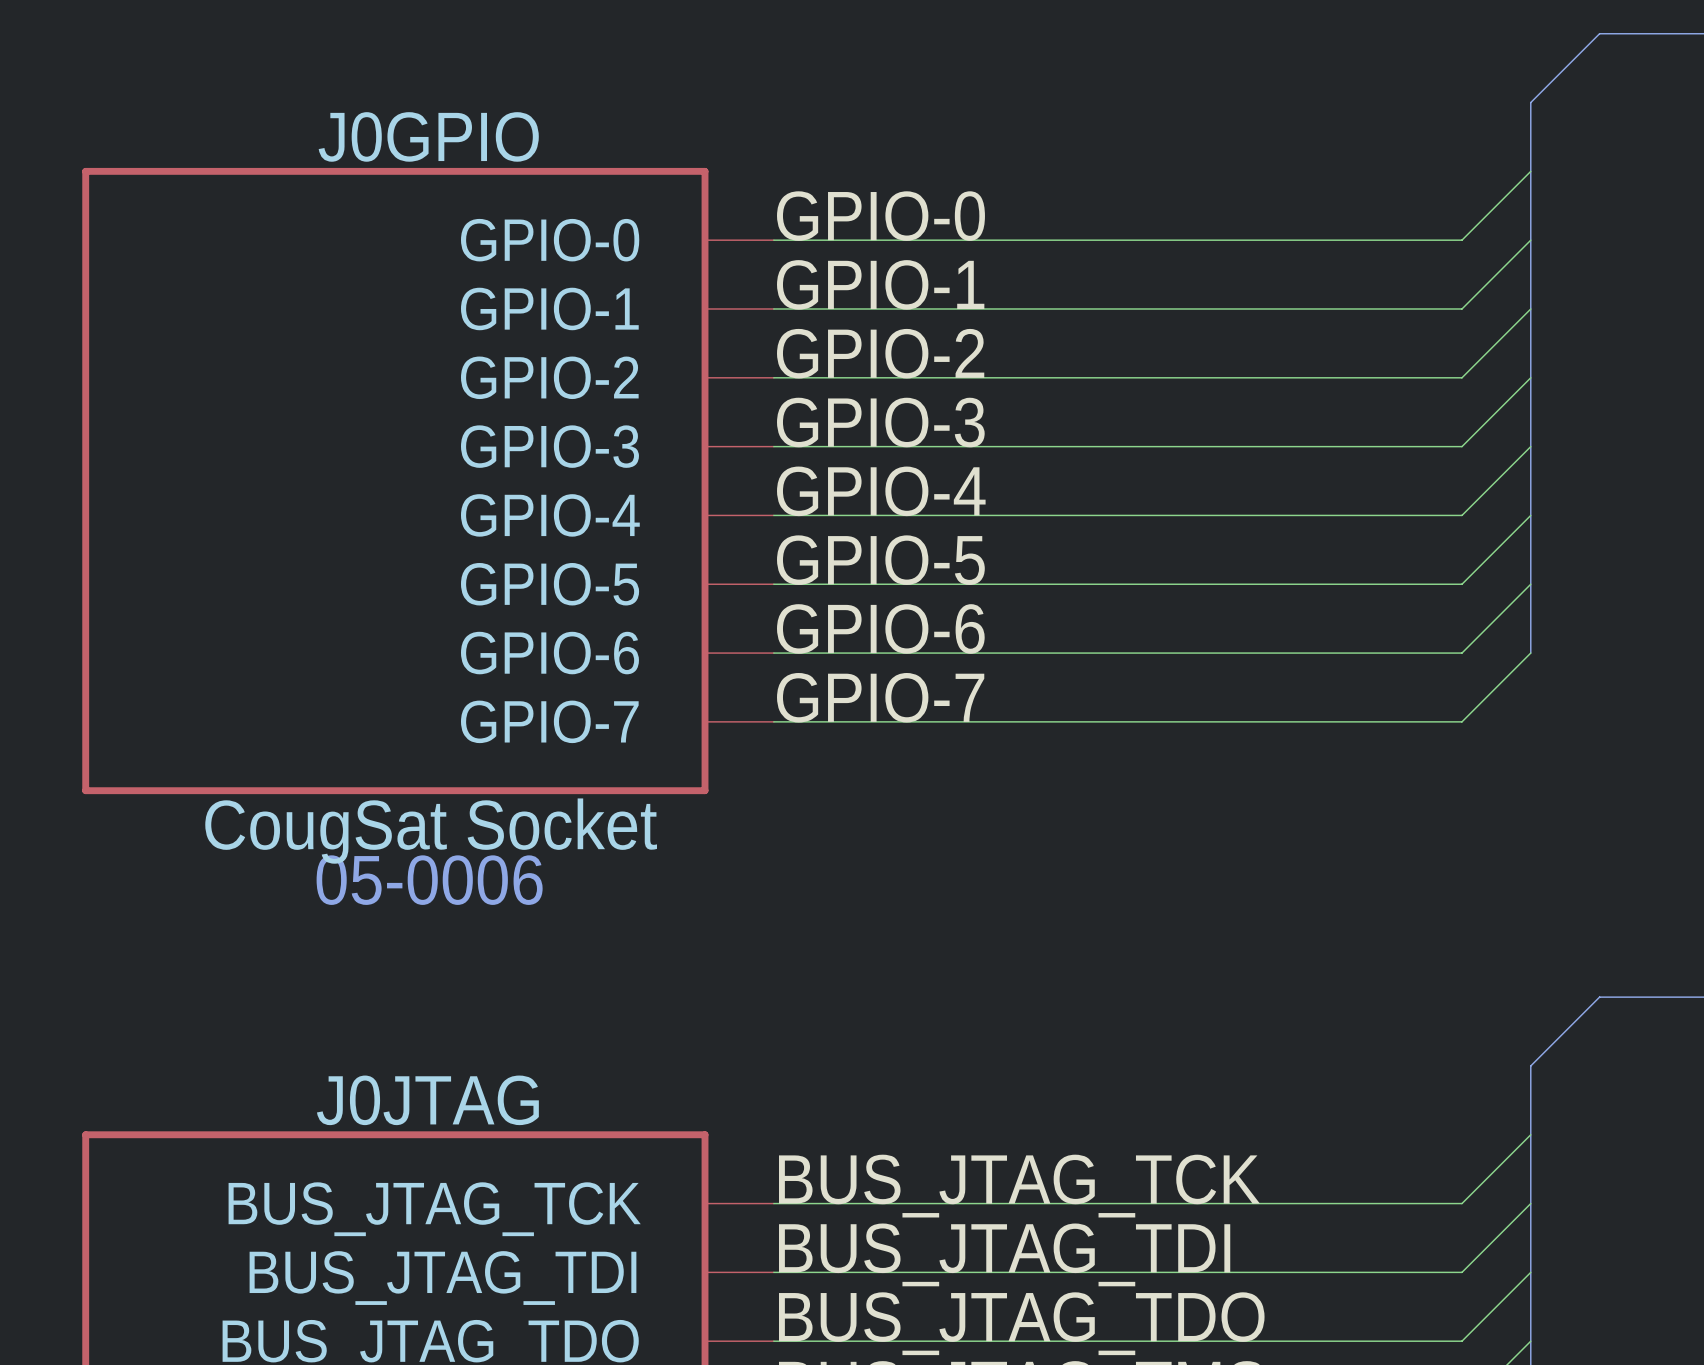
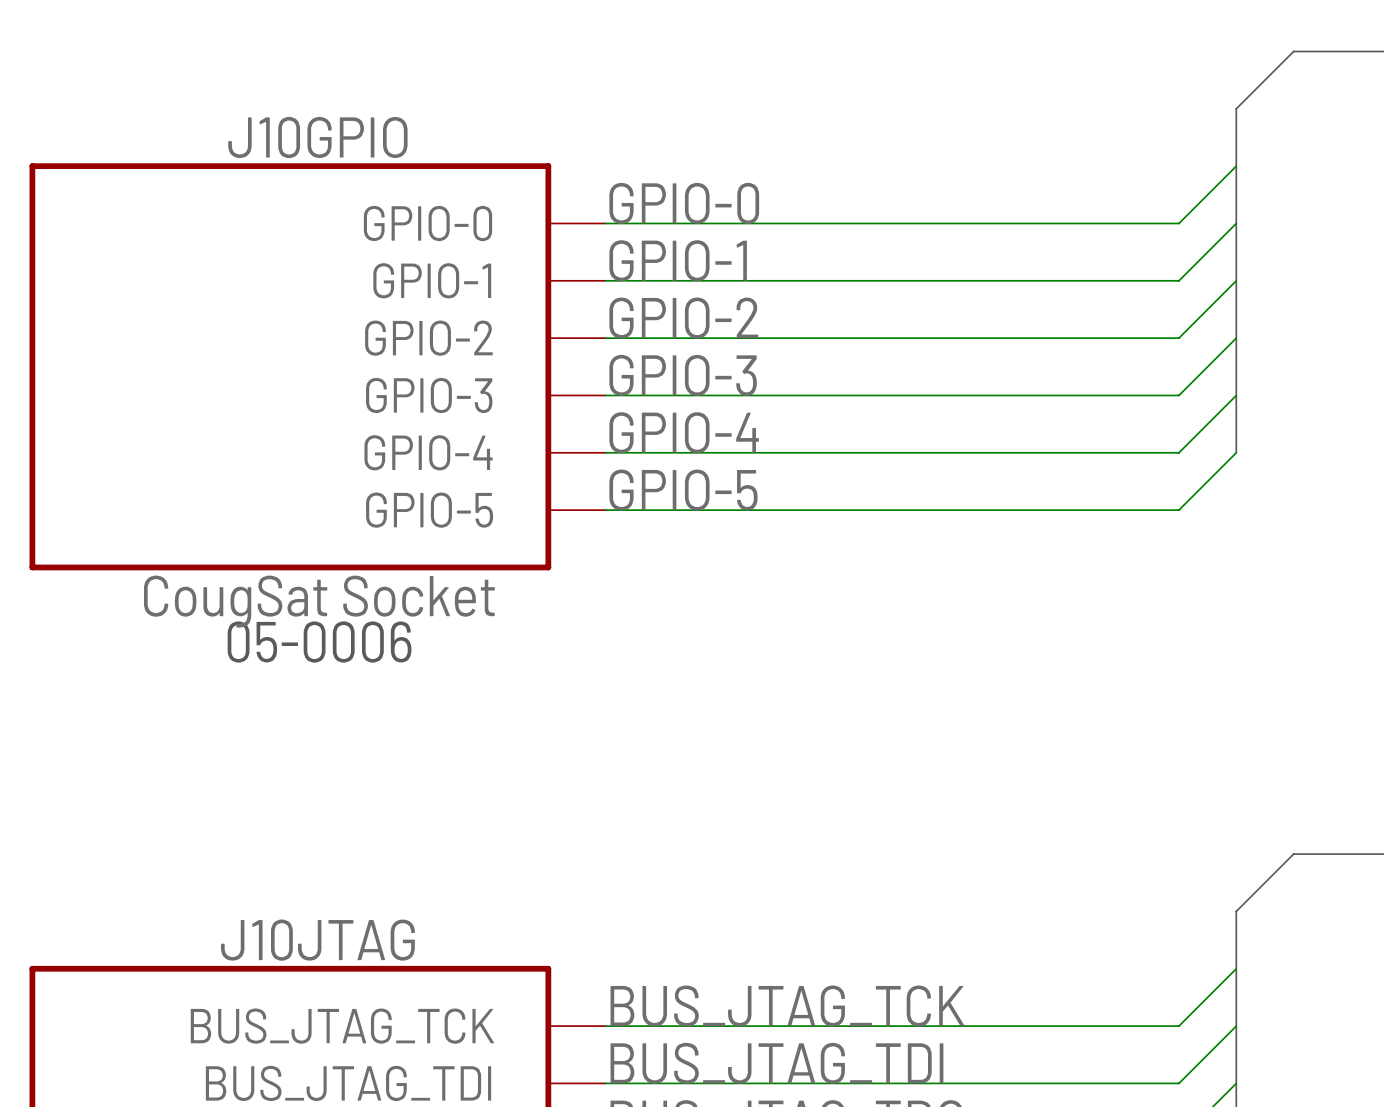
J10GPIO: none -> CougSat Socket (317, 366)
J0GPIO: CougSat Socket (428, 481) -> none
bus: (1530, 515) (1530, 653) -> none
wire: (1530, 584) (1461, 653) (773, 653) -> none
label: GPIO-6 (880, 628) -> none
wire: (1530, 653) (1461, 721) (773, 721) -> none
label: GPIO-7 (880, 697) -> none
J0JTAG name: J0JTAG (427, 1100) -> J10JTAG (317, 940)

